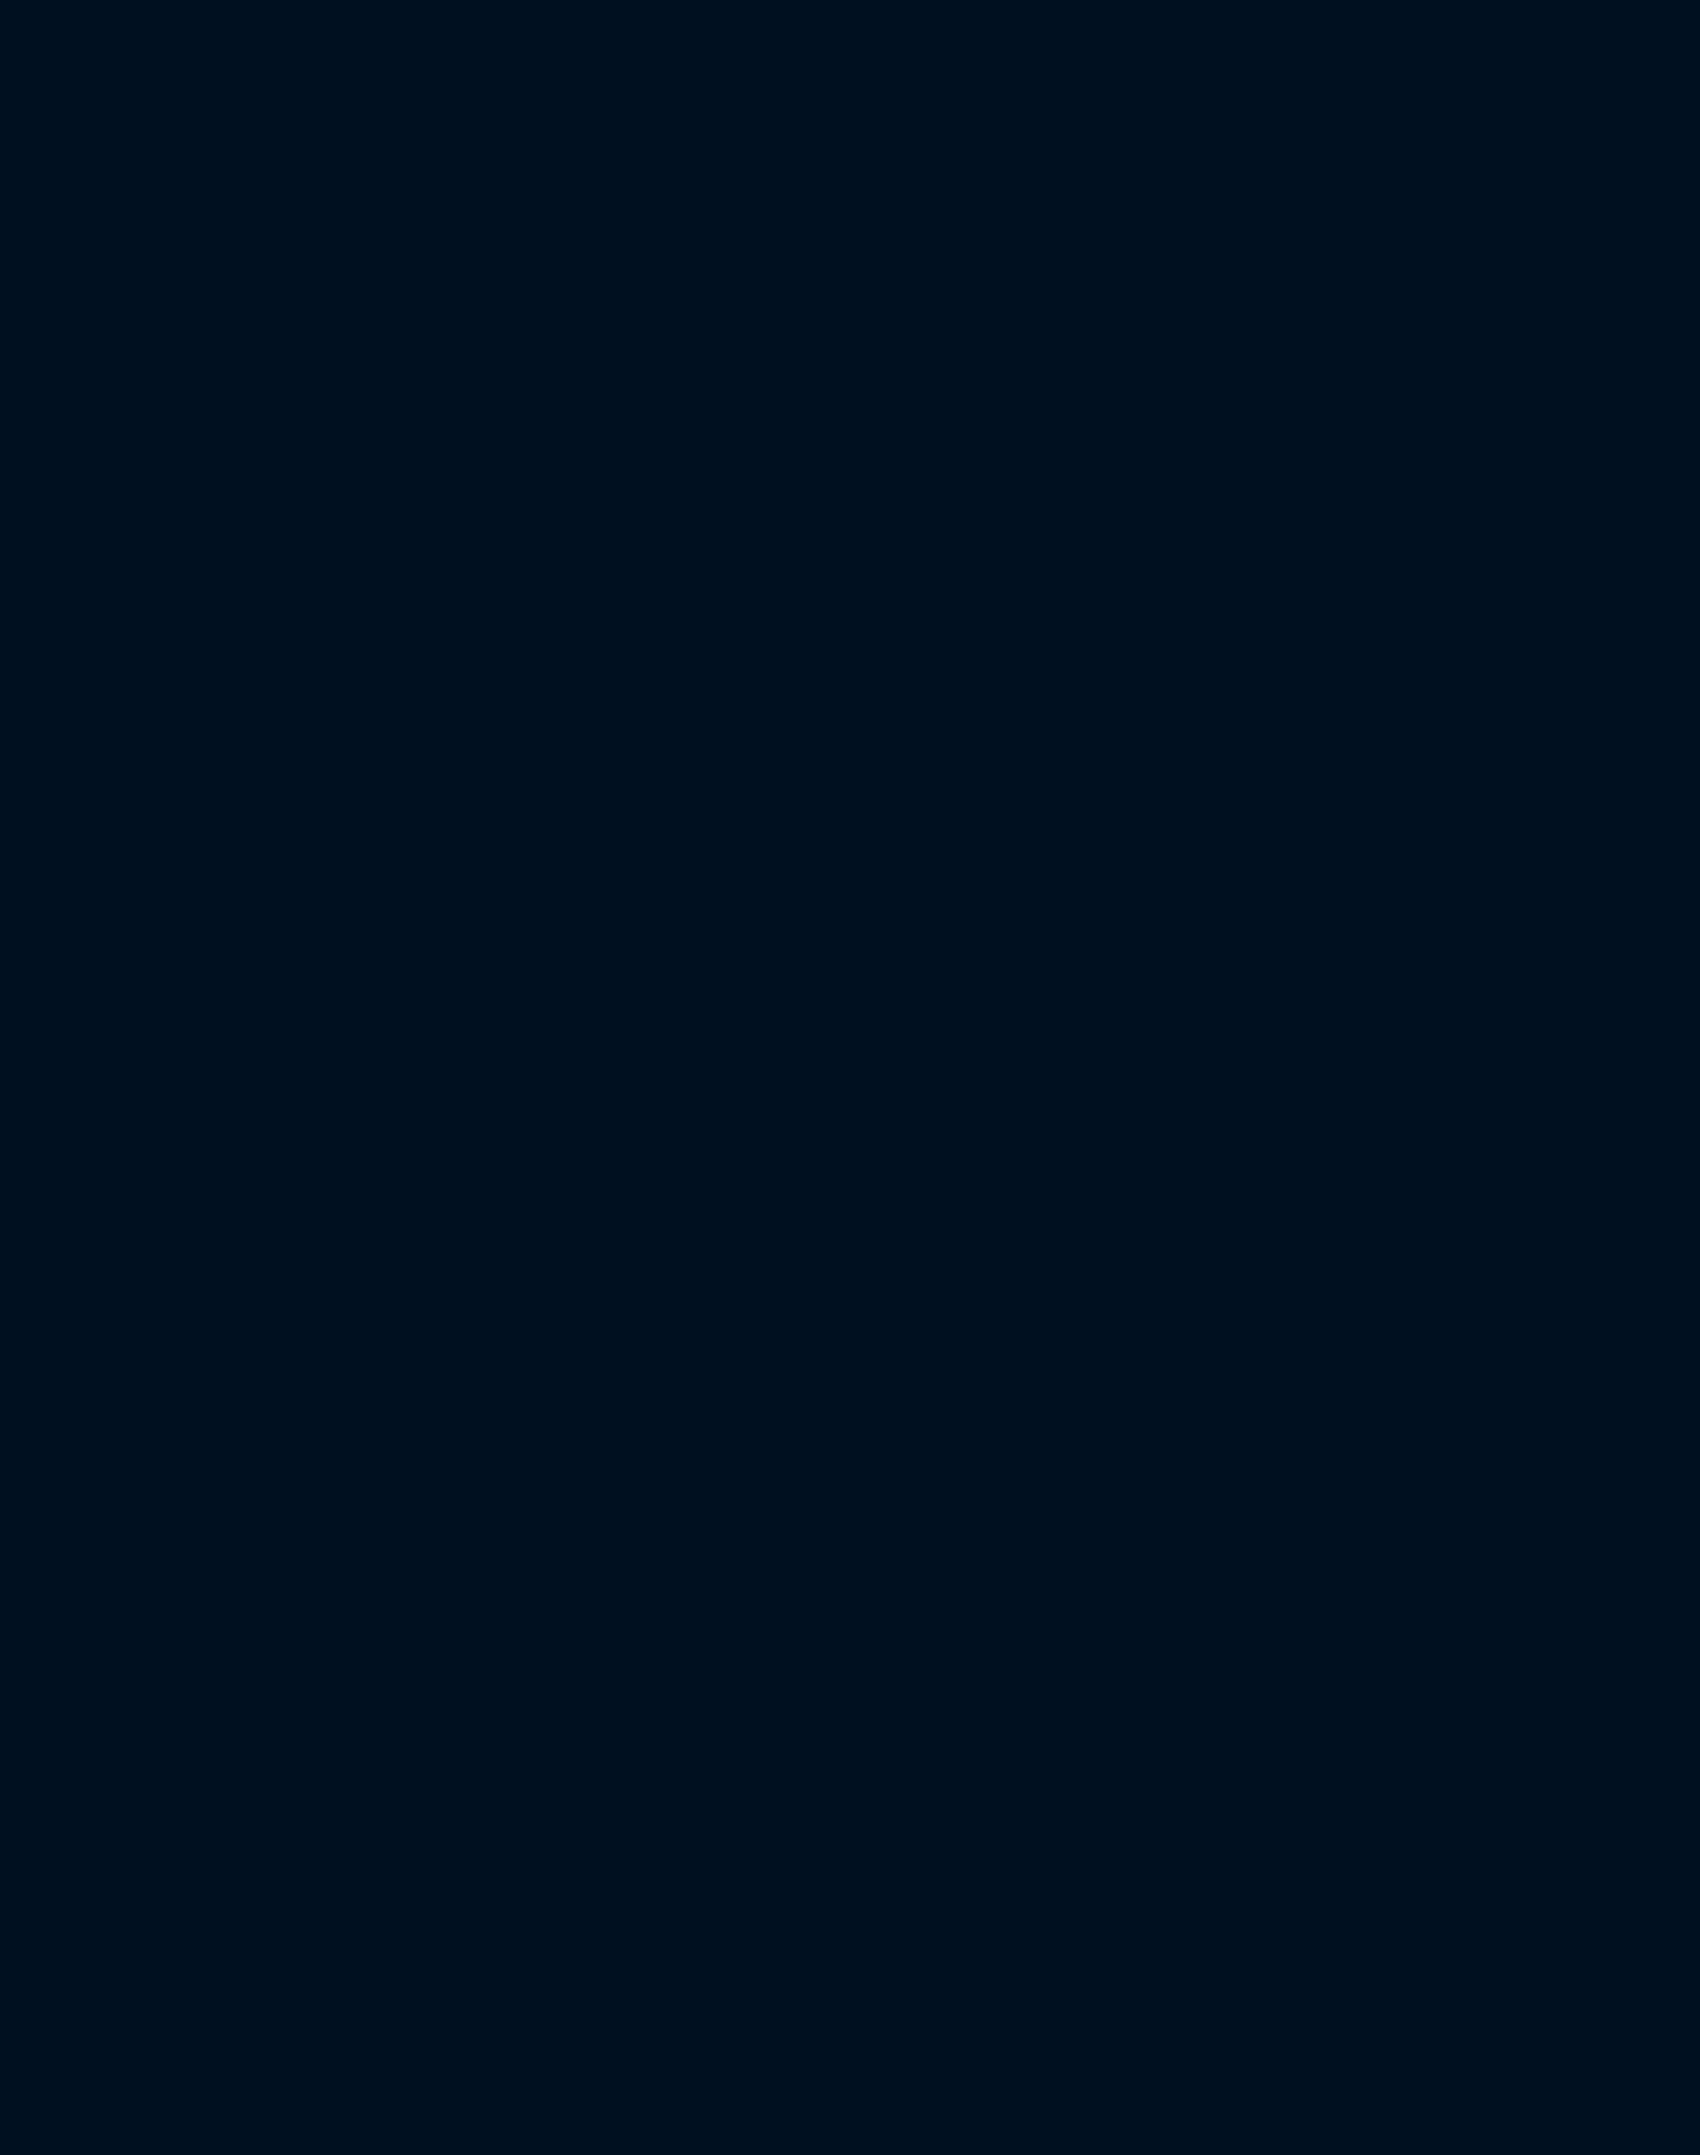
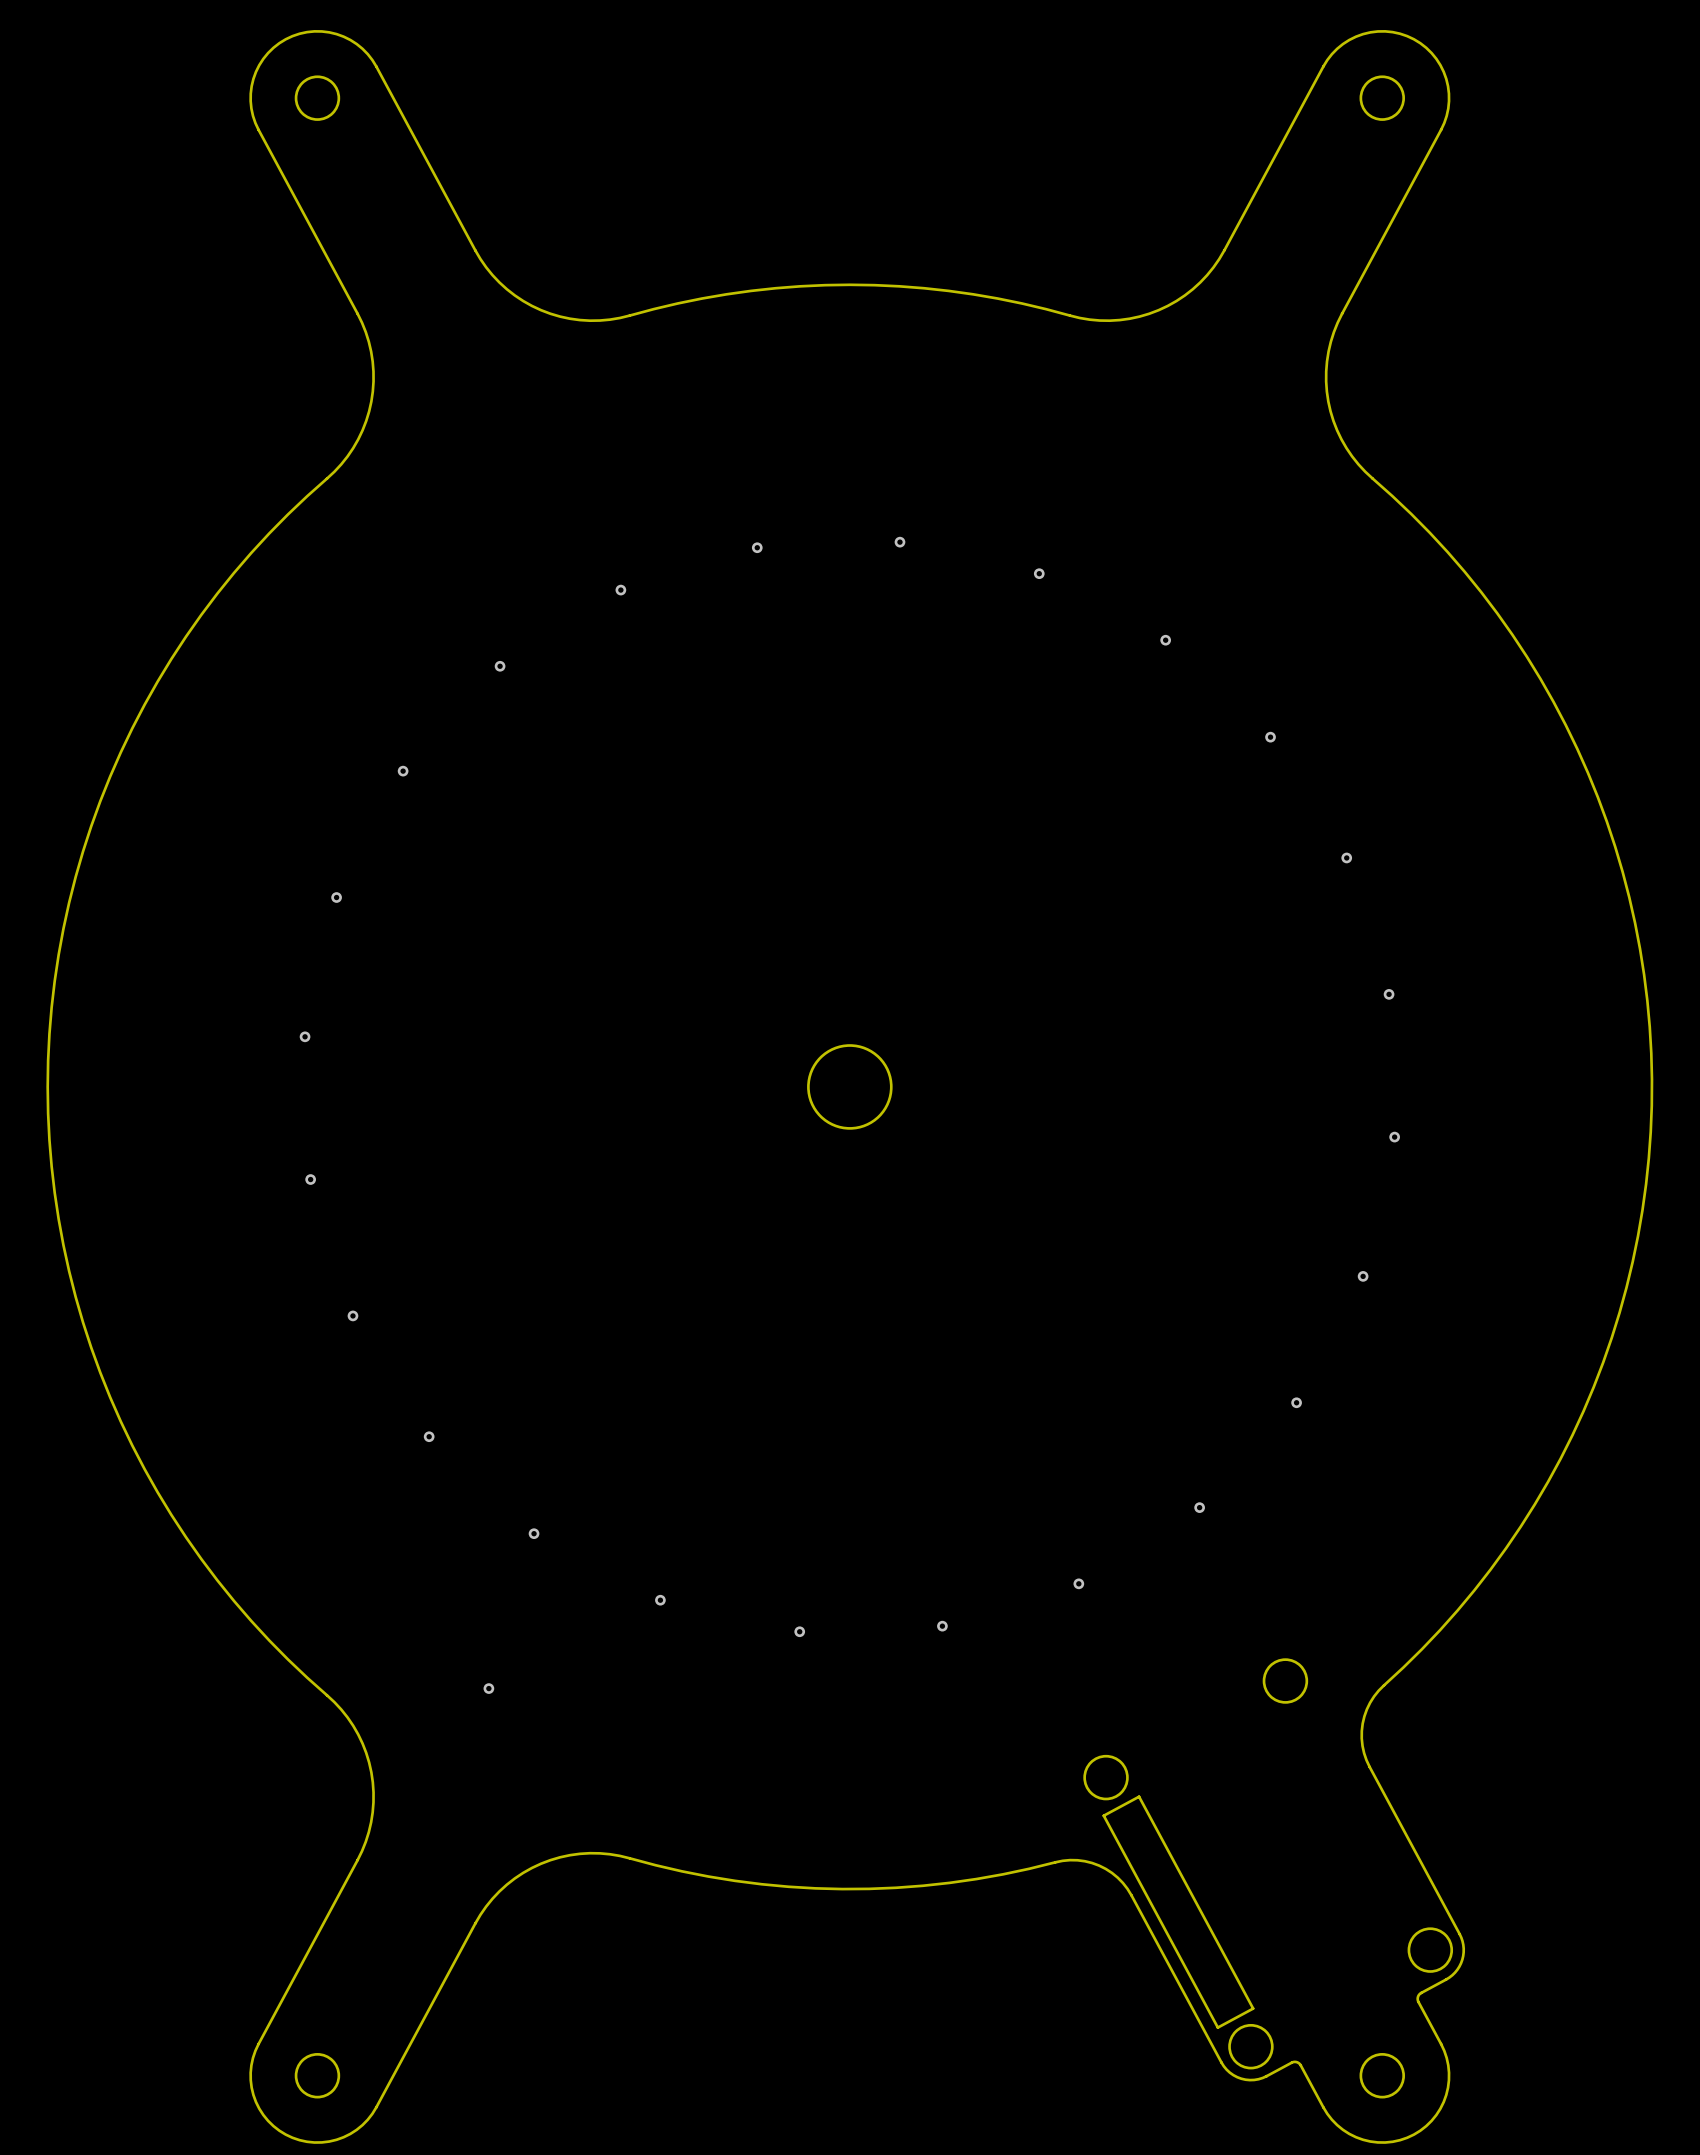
board edge: none -> (1323, 66) (1213, 267) (1200, 282) (1184, 295) (1167, 305) (1149, 313) (1119, 320) (1089, 319) (973, 294) (899, 286) (849, 284) (800, 286) (751, 290) (677, 303) (619, 317) (589, 320) (560, 316) (541, 310) (514, 295) (492, 275) (475, 250) (376, 66) (367, 54) (356, 44) (336, 34) (321, 31) (306, 32) (292, 36) (279, 43) (268, 53) (259, 65) (251, 86) (250, 101) (253, 115) (258, 129) (362, 322) (368, 341) (372, 361) (373, 381) (371, 401) (362, 430) (353, 448) (341, 464) (269, 533) (233, 573) (201, 614) (157, 681) (120, 752) (91, 826) (69, 902) (54, 981) (49, 1033) (47, 1086) (51, 1166) (63, 1245) (83, 1322) (100, 1372) (120, 1421) (157, 1492) (201, 1558) (233, 1600) (269, 1640) (341, 1709) (358, 1734) (369, 1762) (372, 1782) (373, 1802) (371, 1822) (365, 1841) (253, 2057) (250, 2080) (255, 2102) (268, 2120) (285, 2134) (299, 2140) (321, 2142) (343, 2137) (362, 2125) (376, 2107) (475, 1923) (492, 1898) (514, 1878) (541, 1863) (569, 1855) (589, 1853) (619, 1855) (681, 1871) (734, 1880) (788, 1886) (842, 1889) (896, 1887) (949, 1882) (1002, 1874) (1062, 1860) (1077, 1860) (1092, 1863) (1112, 1872) (1127, 1888) (1221, 2062) (1233, 2075) (1245, 2079) (1258, 2079) (1292, 2062) (1297, 2062) (1331, 2119) (1349, 2133) (1370, 2141) (1392, 2141) (1407, 2137) (1426, 2126) (1440, 2108) (1448, 2087) (1448, 2065) (1444, 2050) (1417, 1997) (1420, 1993) (1454, 1972) (1462, 1959) (1463, 1944) (1459, 1934) (1366, 1760) (1361, 1738) (1362, 1723) (1370, 1702) (1378, 1690) (1440, 1630) (1474, 1590) (1506, 1548) (1548, 1481) (1583, 1411) (1603, 1362) (1619, 1312) (1638, 1236) (1648, 1158) (1651, 1105) (1651, 1053) (1644, 974) (1635, 922) (1622, 871) (1597, 797) (1565, 725) (1526, 656) (1481, 592) (1429, 532) (1365, 471) (1352, 456) (1337, 430) (1328, 401) (1326, 381) (1327, 361) (1333, 332) (1444, 123) (1449, 101) (1446, 78) (1436, 58) (1420, 43) (1407, 36) (1385, 31) (1370, 32) (1349, 40) (1337, 48) (1323, 66)
round board edge: none -> [294, 75, 341, 121]
round board edge: none -> [1359, 75, 1405, 121]
via: none -> (899, 542)
via: none -> (757, 547)
via: none -> (1039, 573)
via: none -> (620, 590)
via: none -> (1165, 640)
via: none -> (500, 666)
via: none -> (1270, 737)
via: none -> (403, 771)
via: none -> (1346, 857)
via: none -> (336, 897)
via: none -> (1389, 994)
via: none -> (305, 1036)
round board edge: none -> [807, 1044, 893, 1130]
via: none -> (1394, 1137)
via: none -> (310, 1179)
via: none -> (1363, 1276)
via: none -> (352, 1315)
via: none -> (1296, 1402)
via: none -> (429, 1436)
via: none -> (1199, 1507)
via: none -> (534, 1533)
via: none -> (1078, 1583)
via: none -> (660, 1600)
via: none -> (942, 1626)
via: none -> (799, 1631)
round board edge: none -> [1262, 1658, 1309, 1704]
via: none -> (488, 1688)
round board edge: none -> [1083, 1754, 1129, 1801]
board edge: none -> (1139, 1796) (1103, 1815) (1217, 2027) (1253, 2008) (1139, 1796)
round board edge: none -> [1407, 1927, 1454, 1973]
round board edge: none -> [1228, 2023, 1274, 2070]
round board edge: none -> [294, 2053, 341, 2099]
round board edge: none -> [1359, 2053, 1405, 2099]

